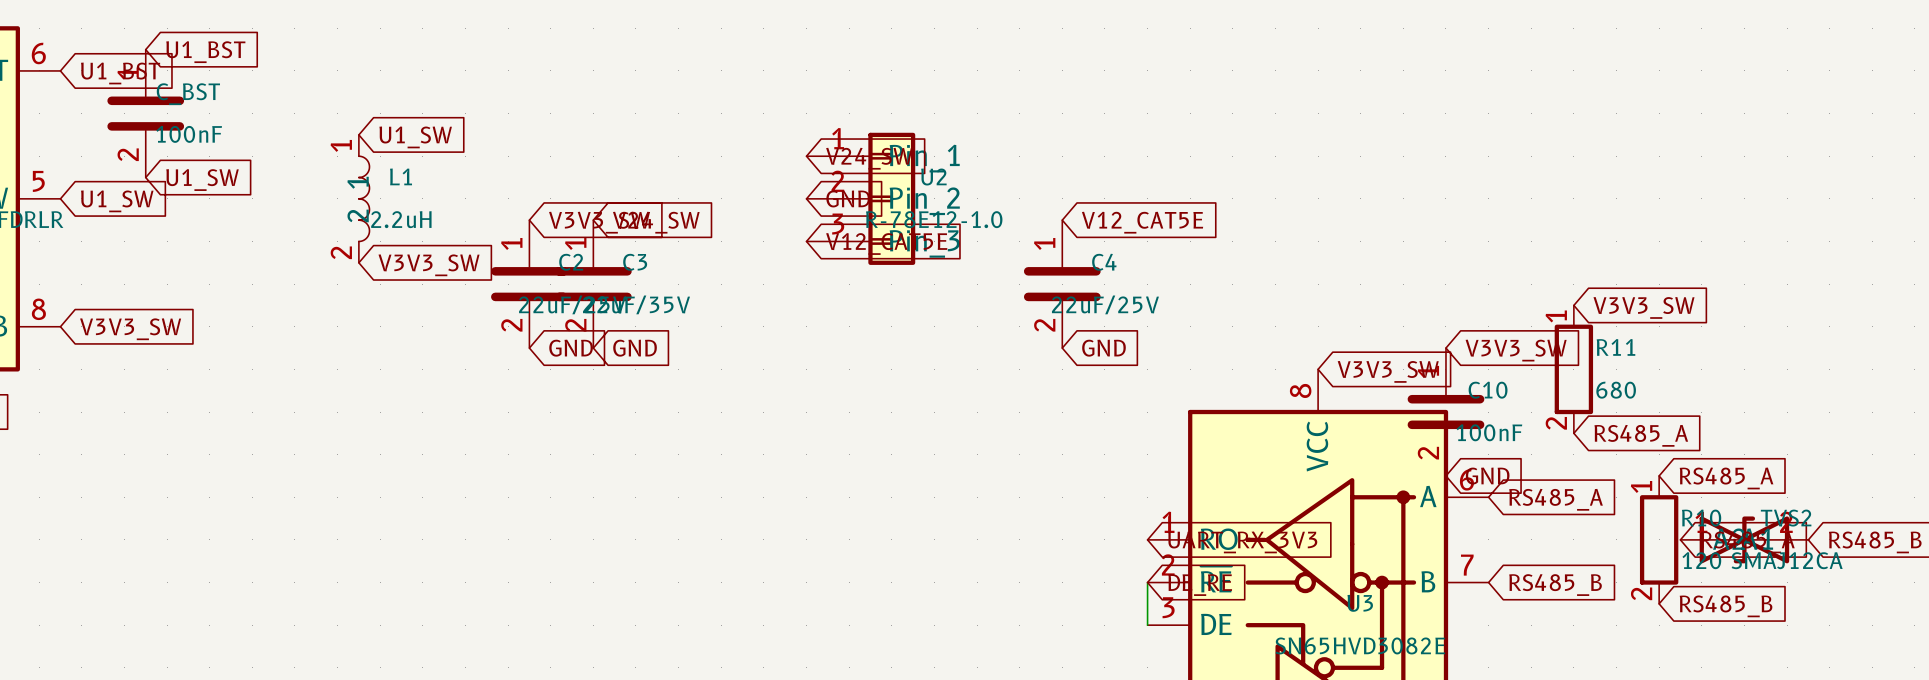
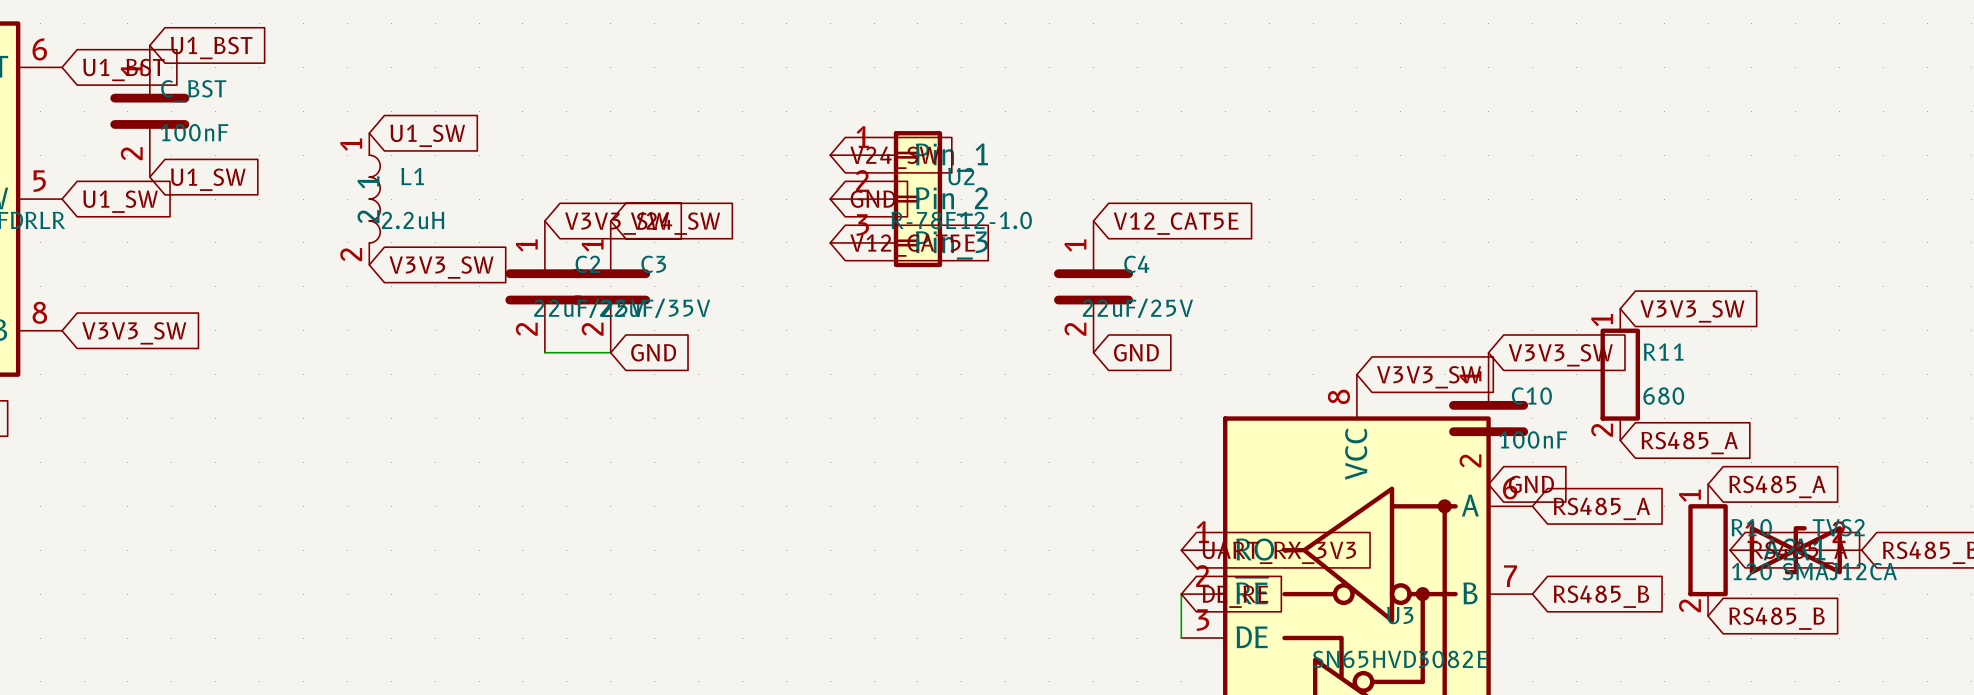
wire: none -> (544, 352) (610, 352)
global label: GND (571, 348) -> none

